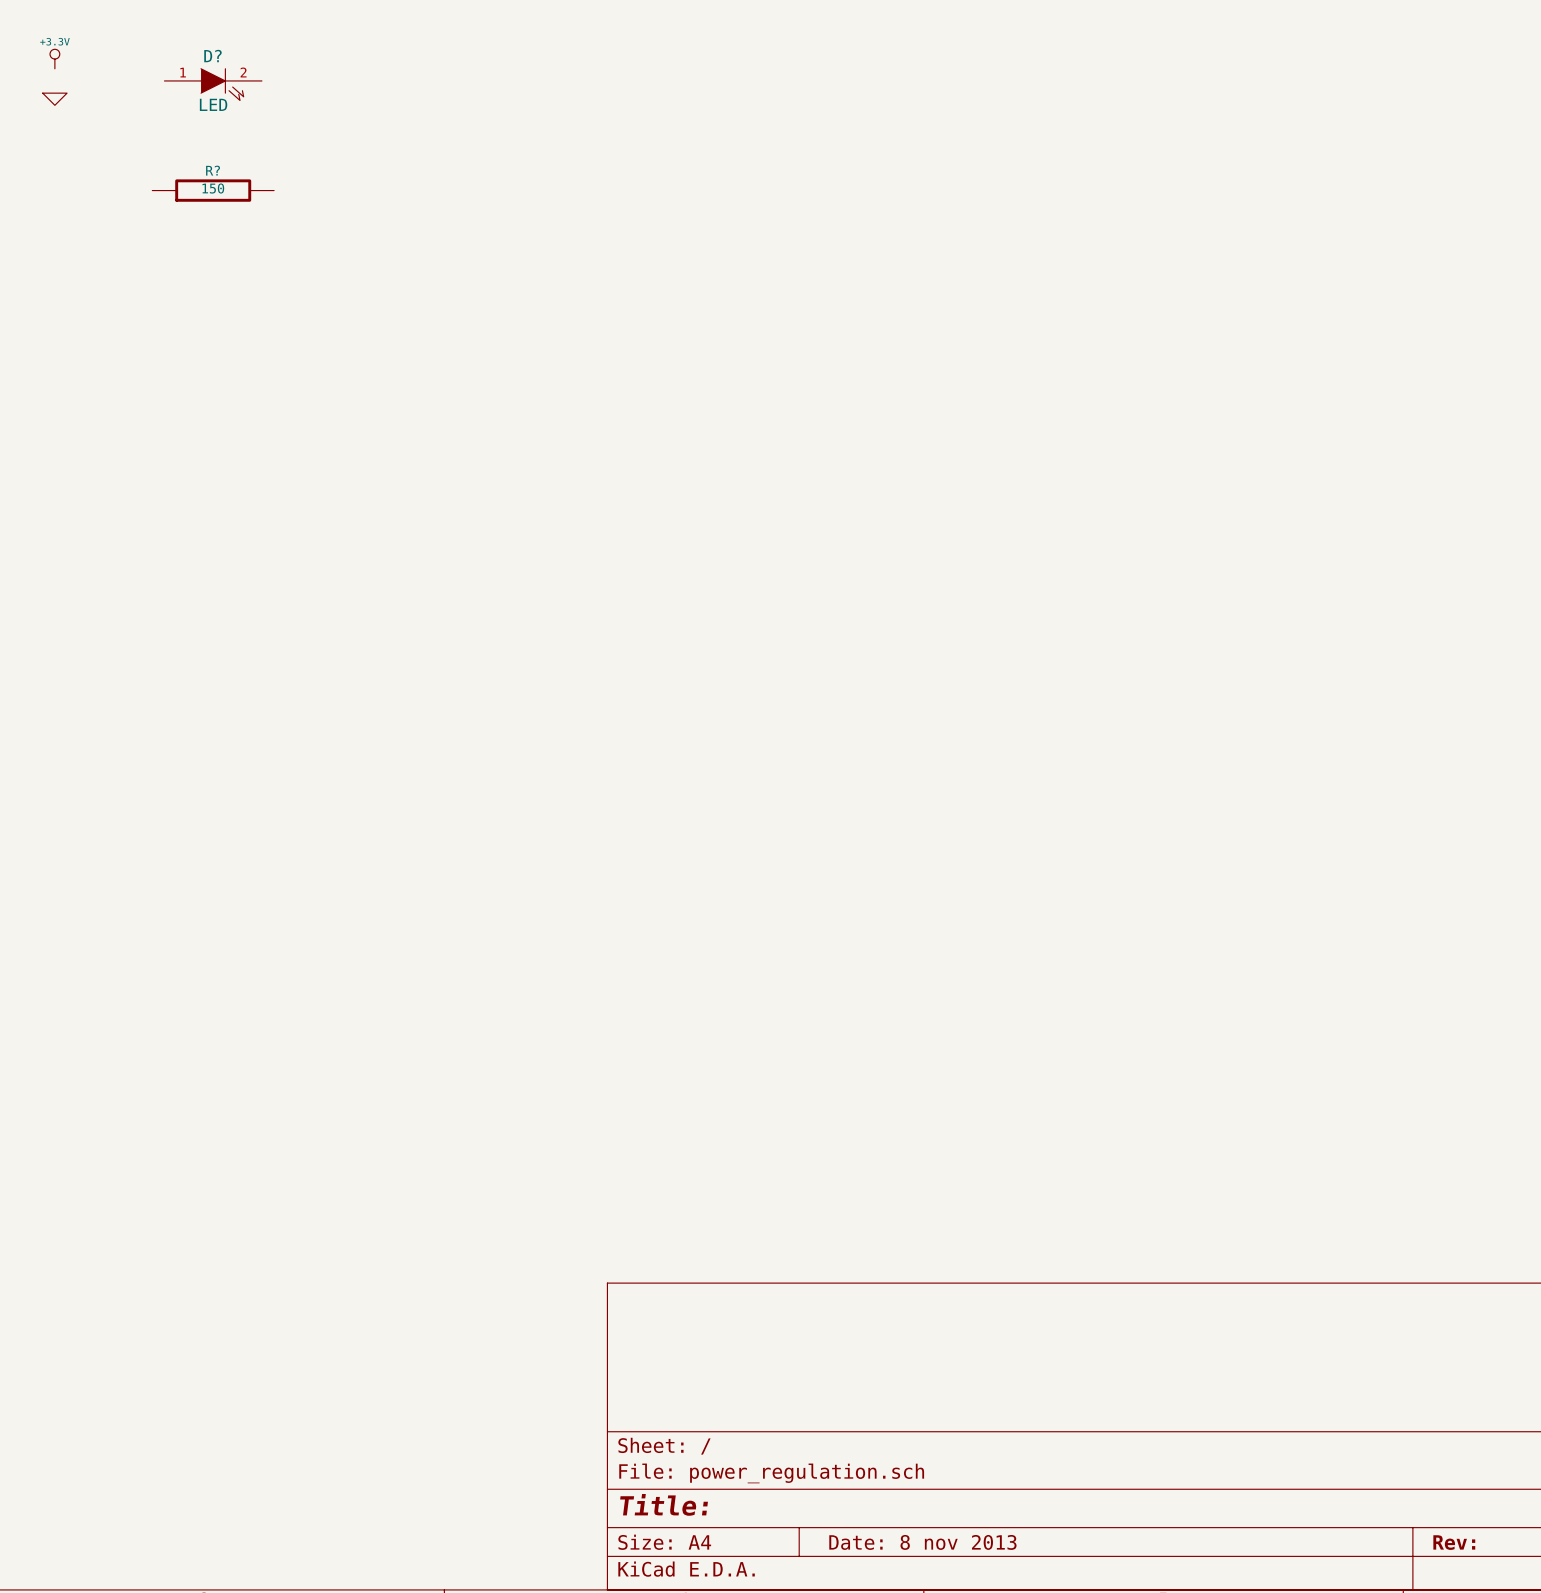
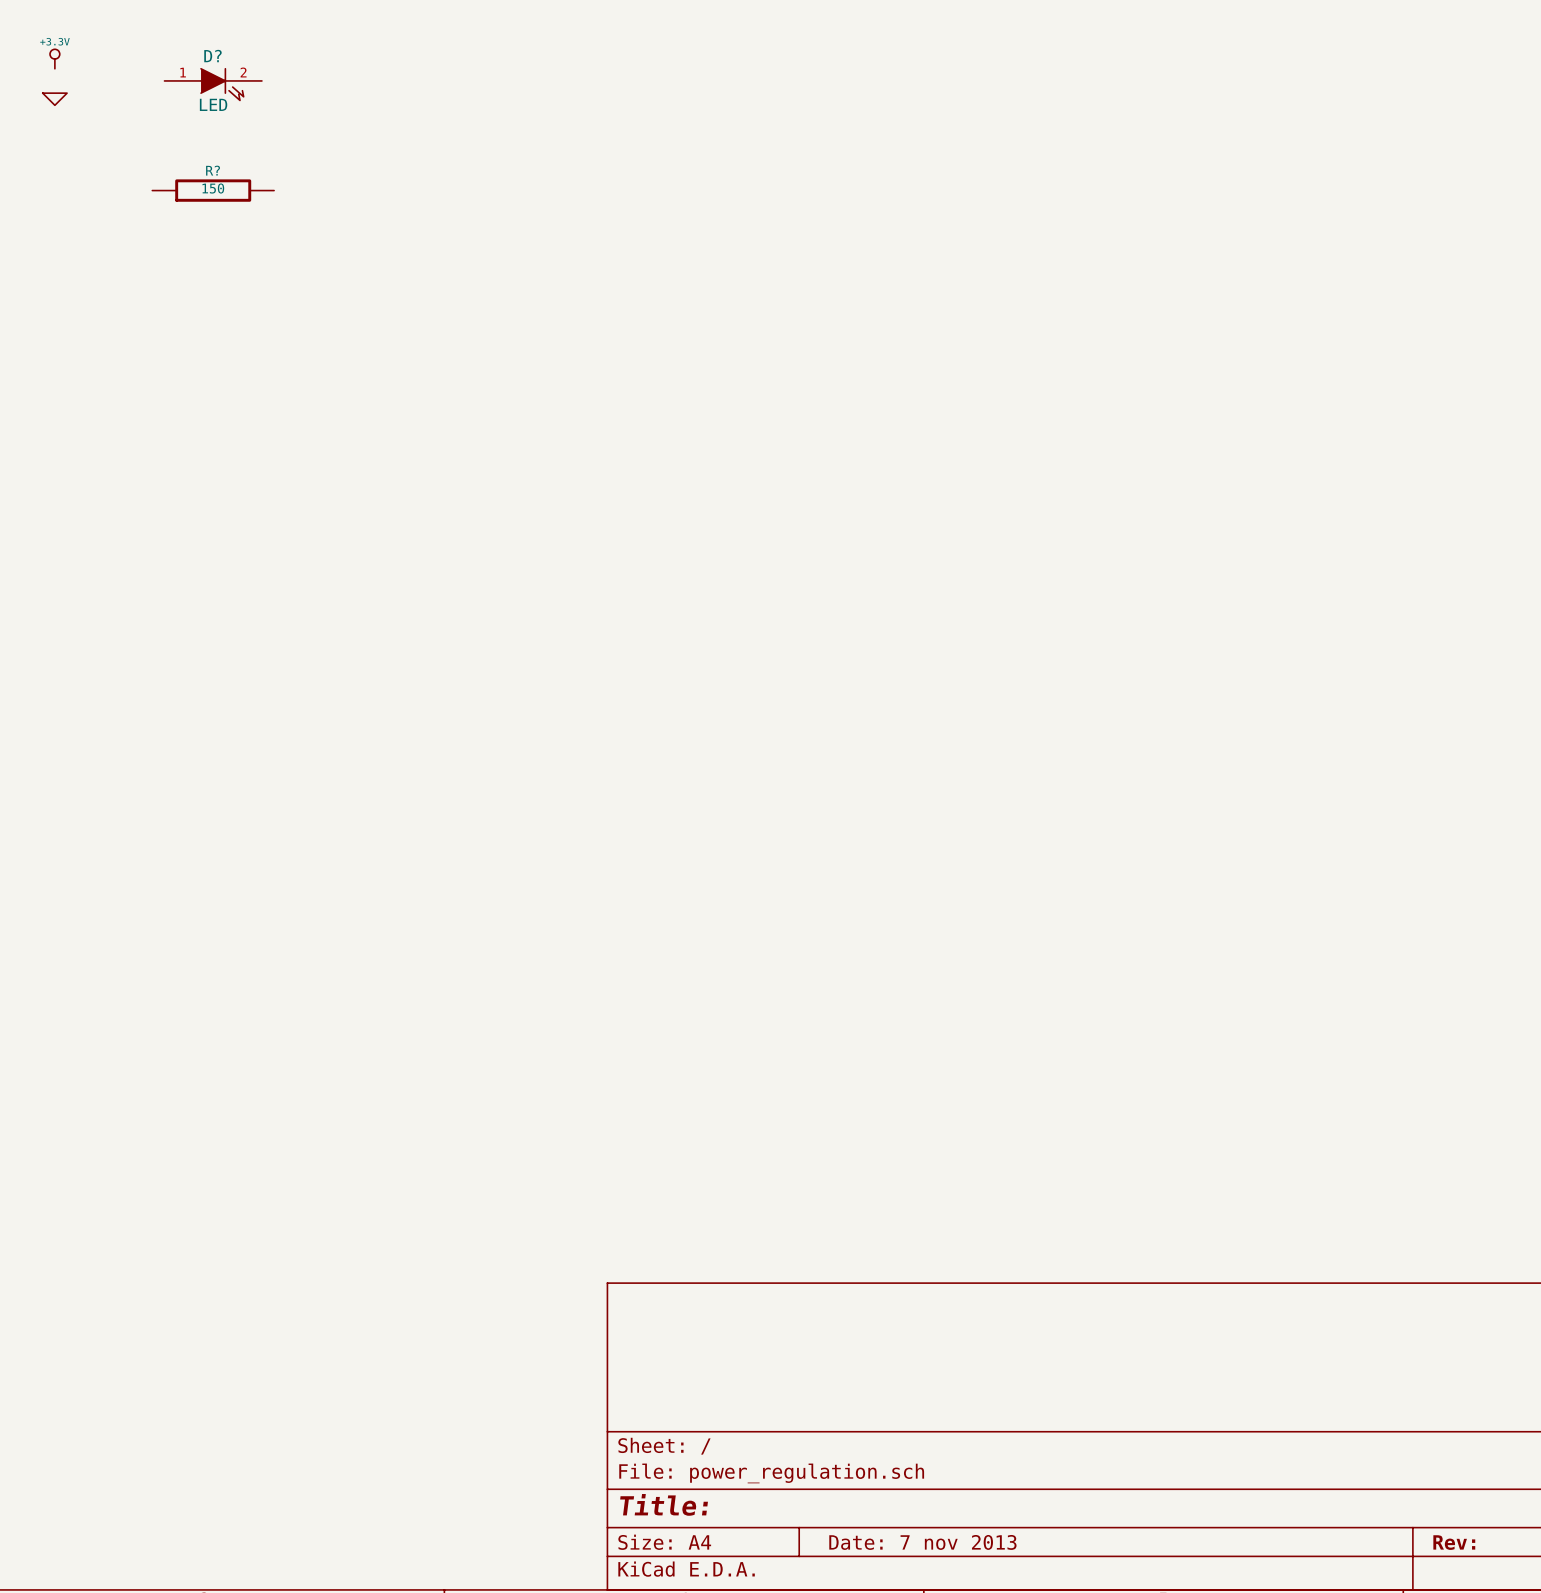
title block: Date: 8 nov 2013 (922, 1542) -> Date: 7 nov 2013 (922, 1542)

